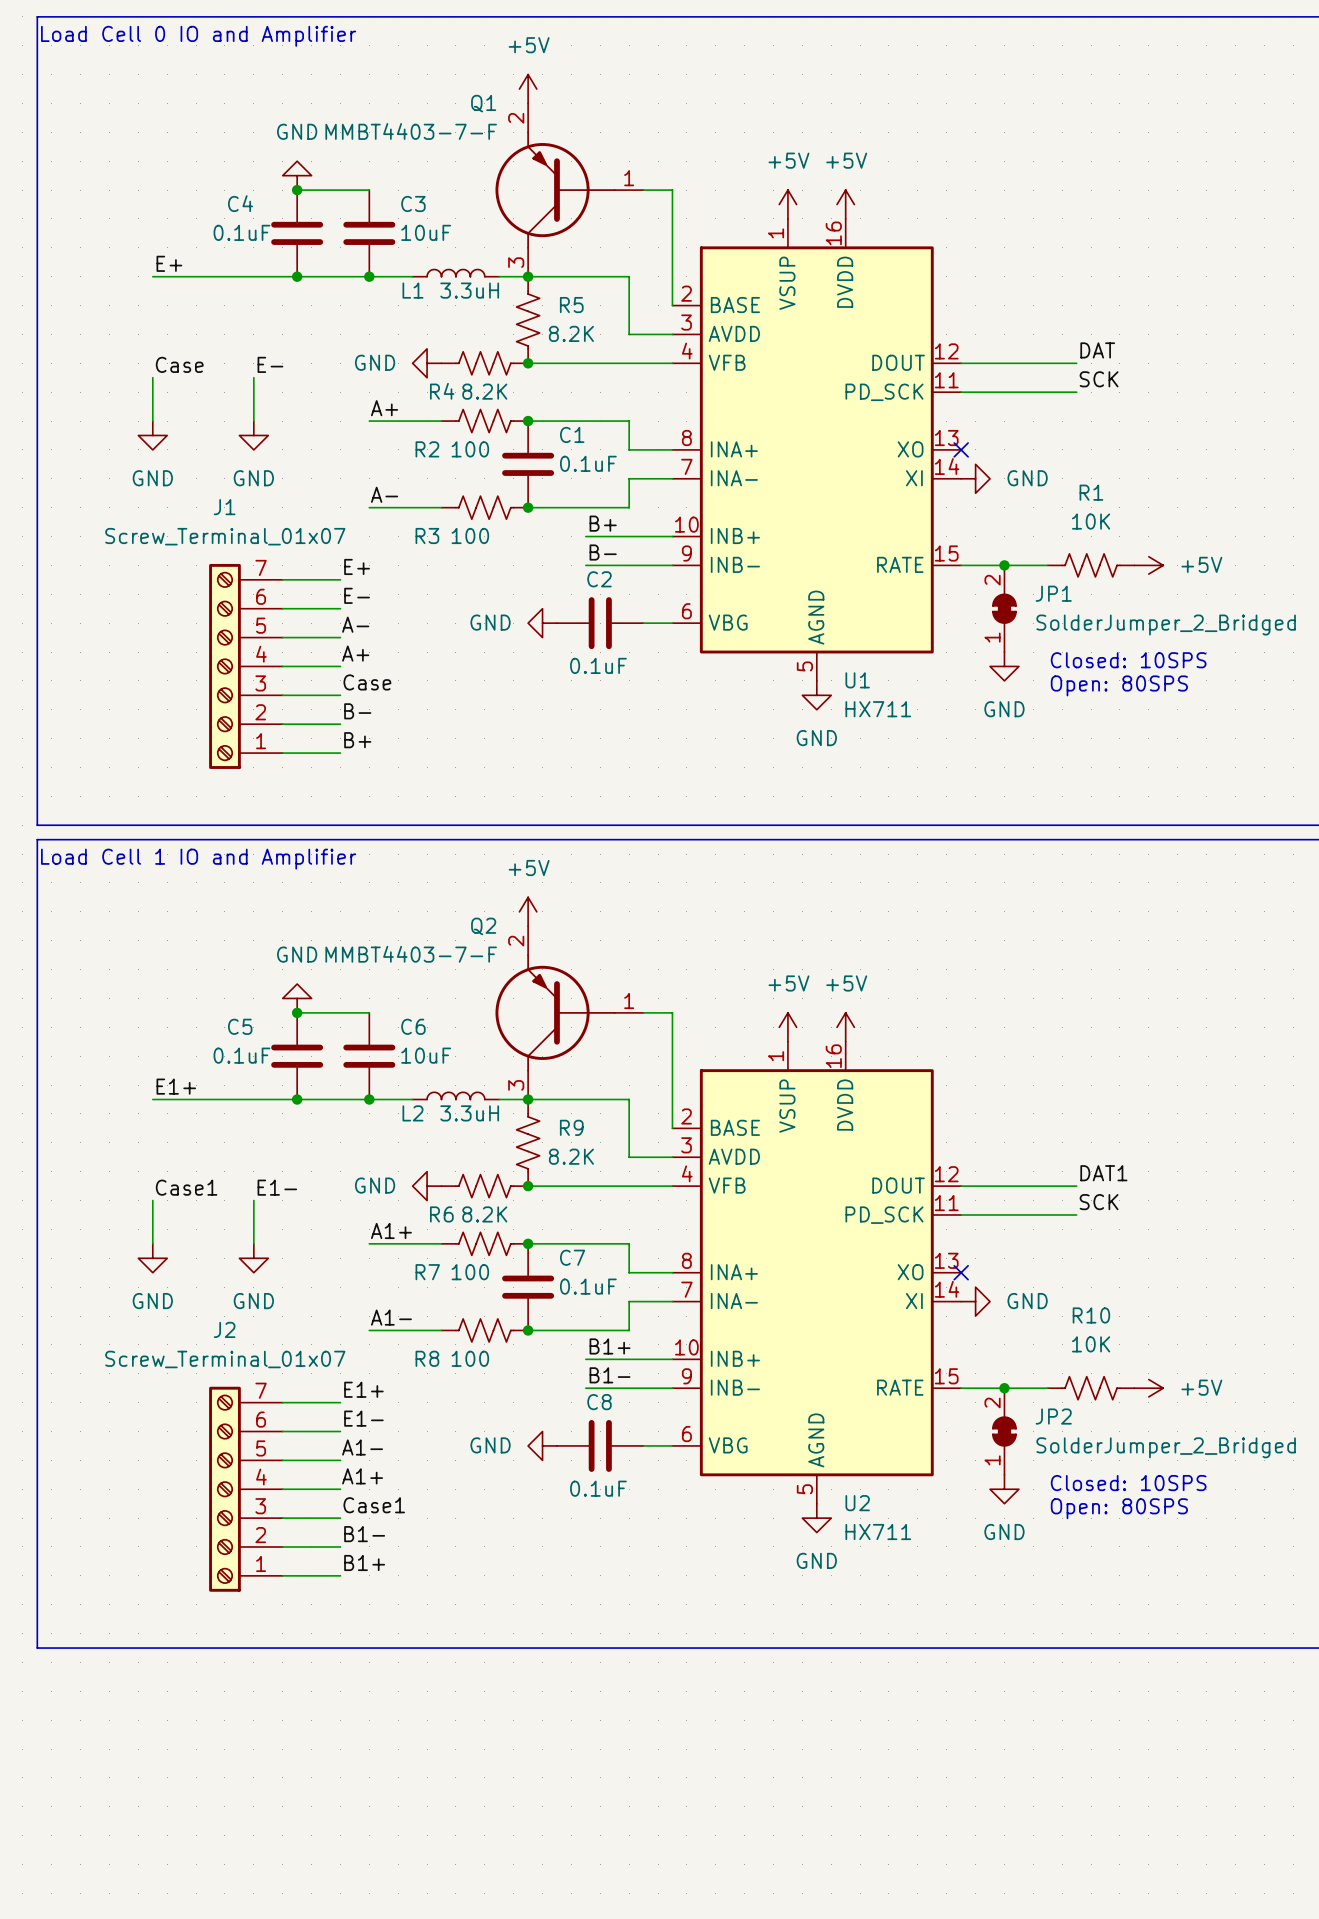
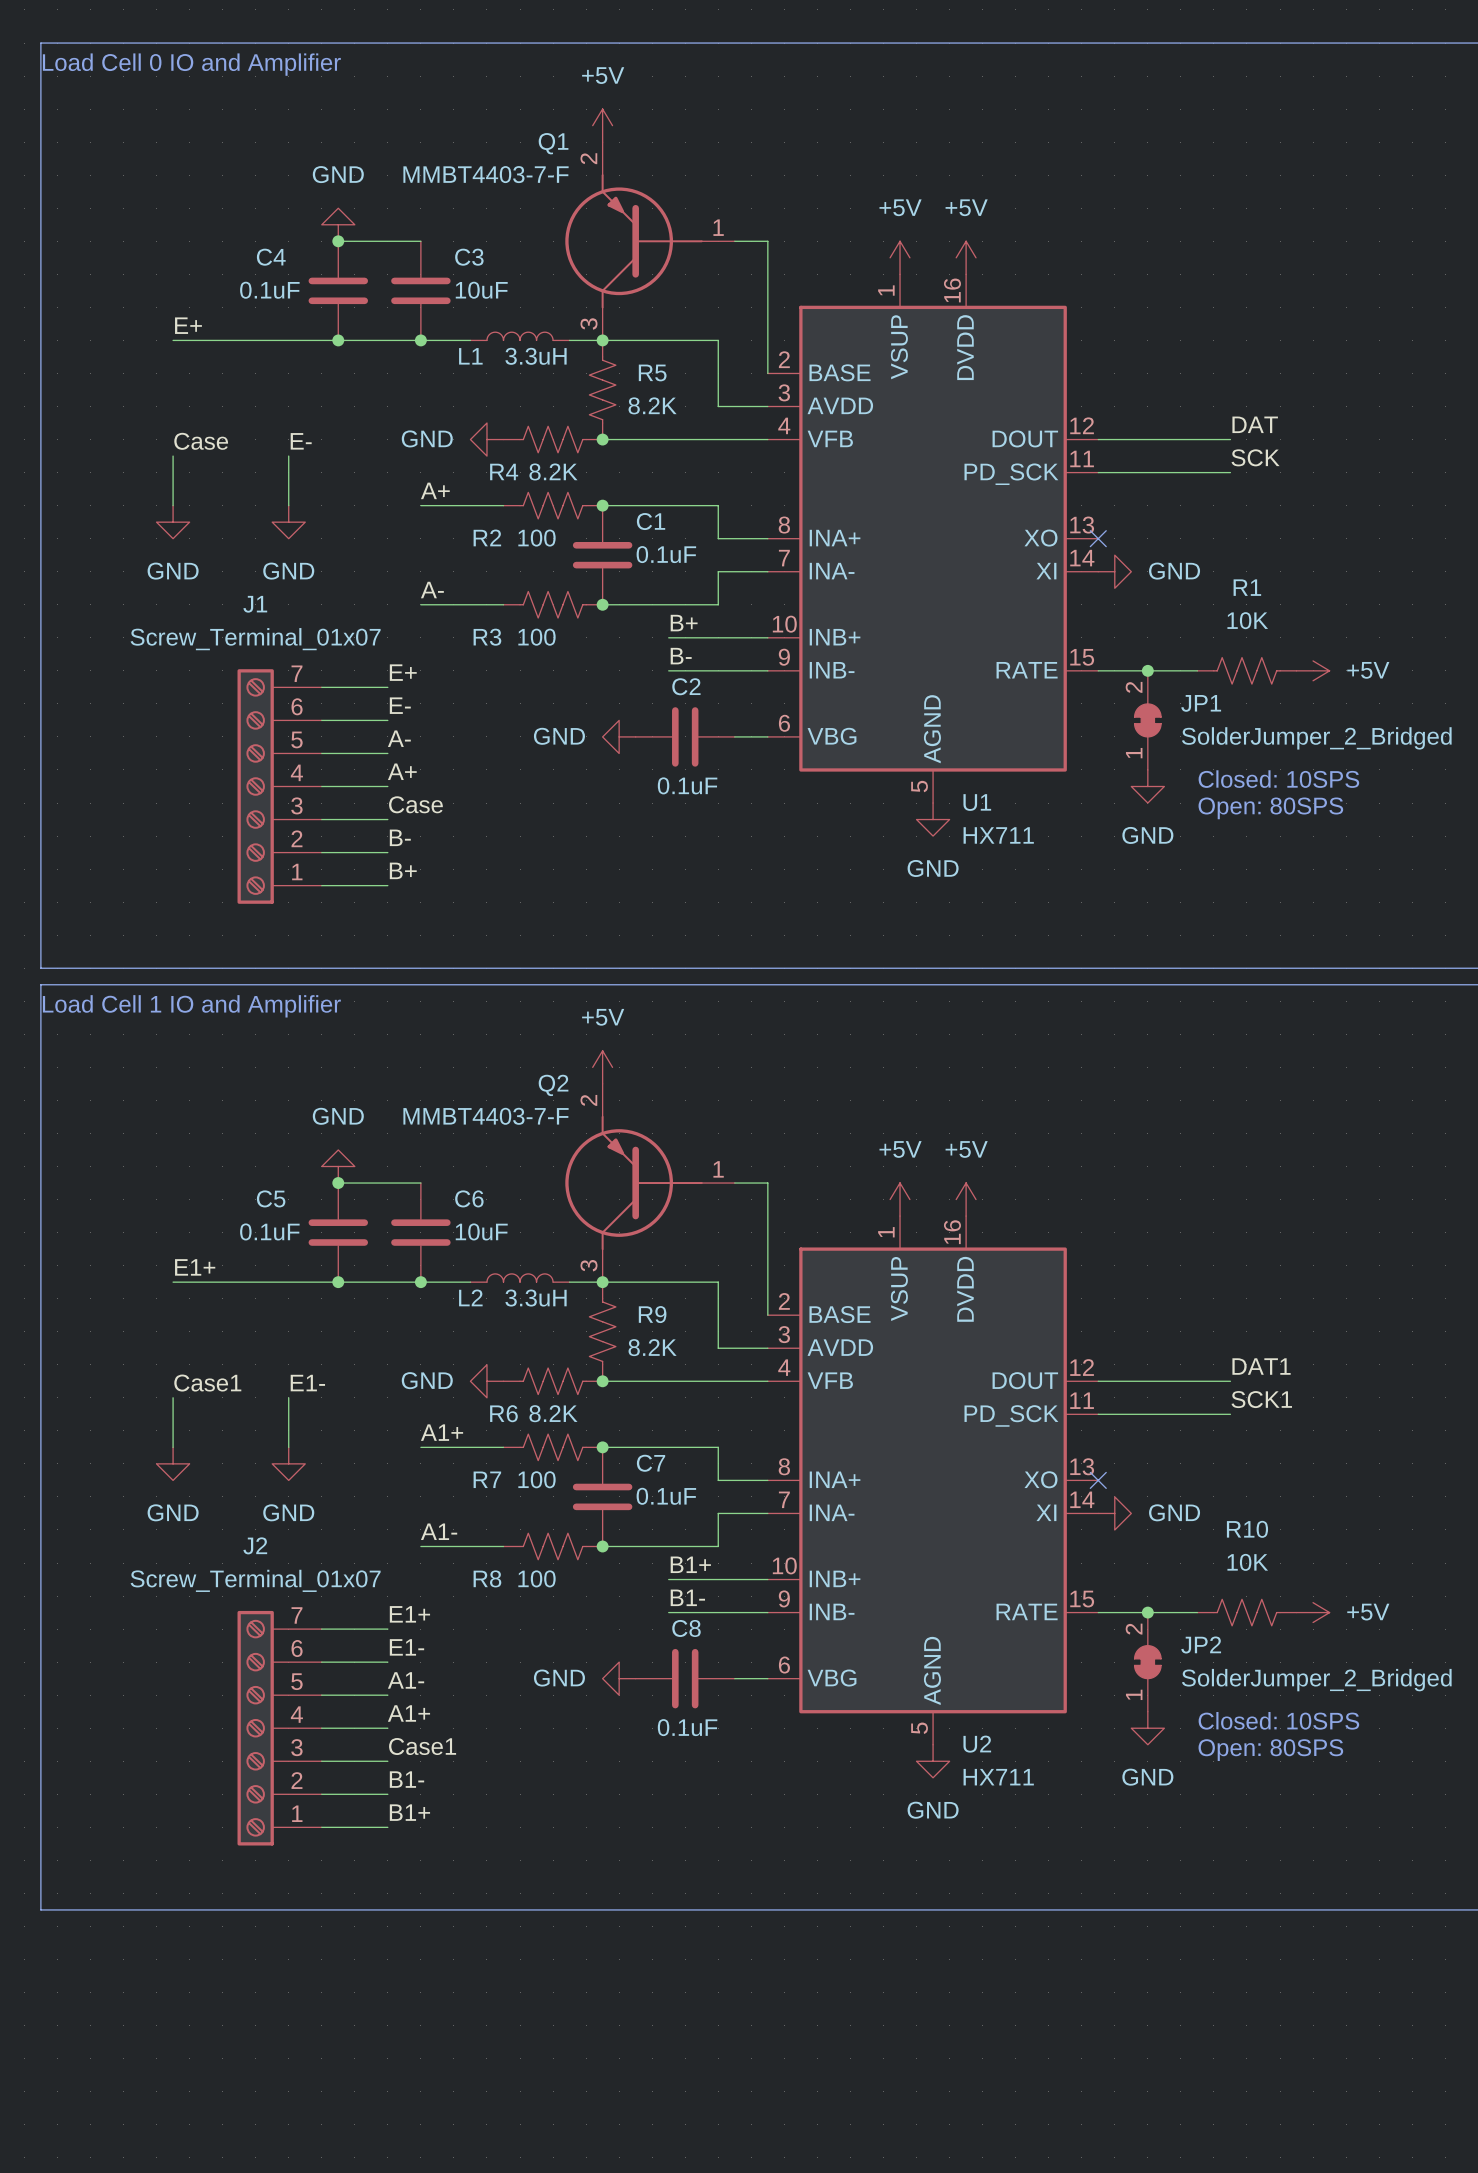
label: SCK (1099, 1202) -> SCK1 (1261, 1399)

